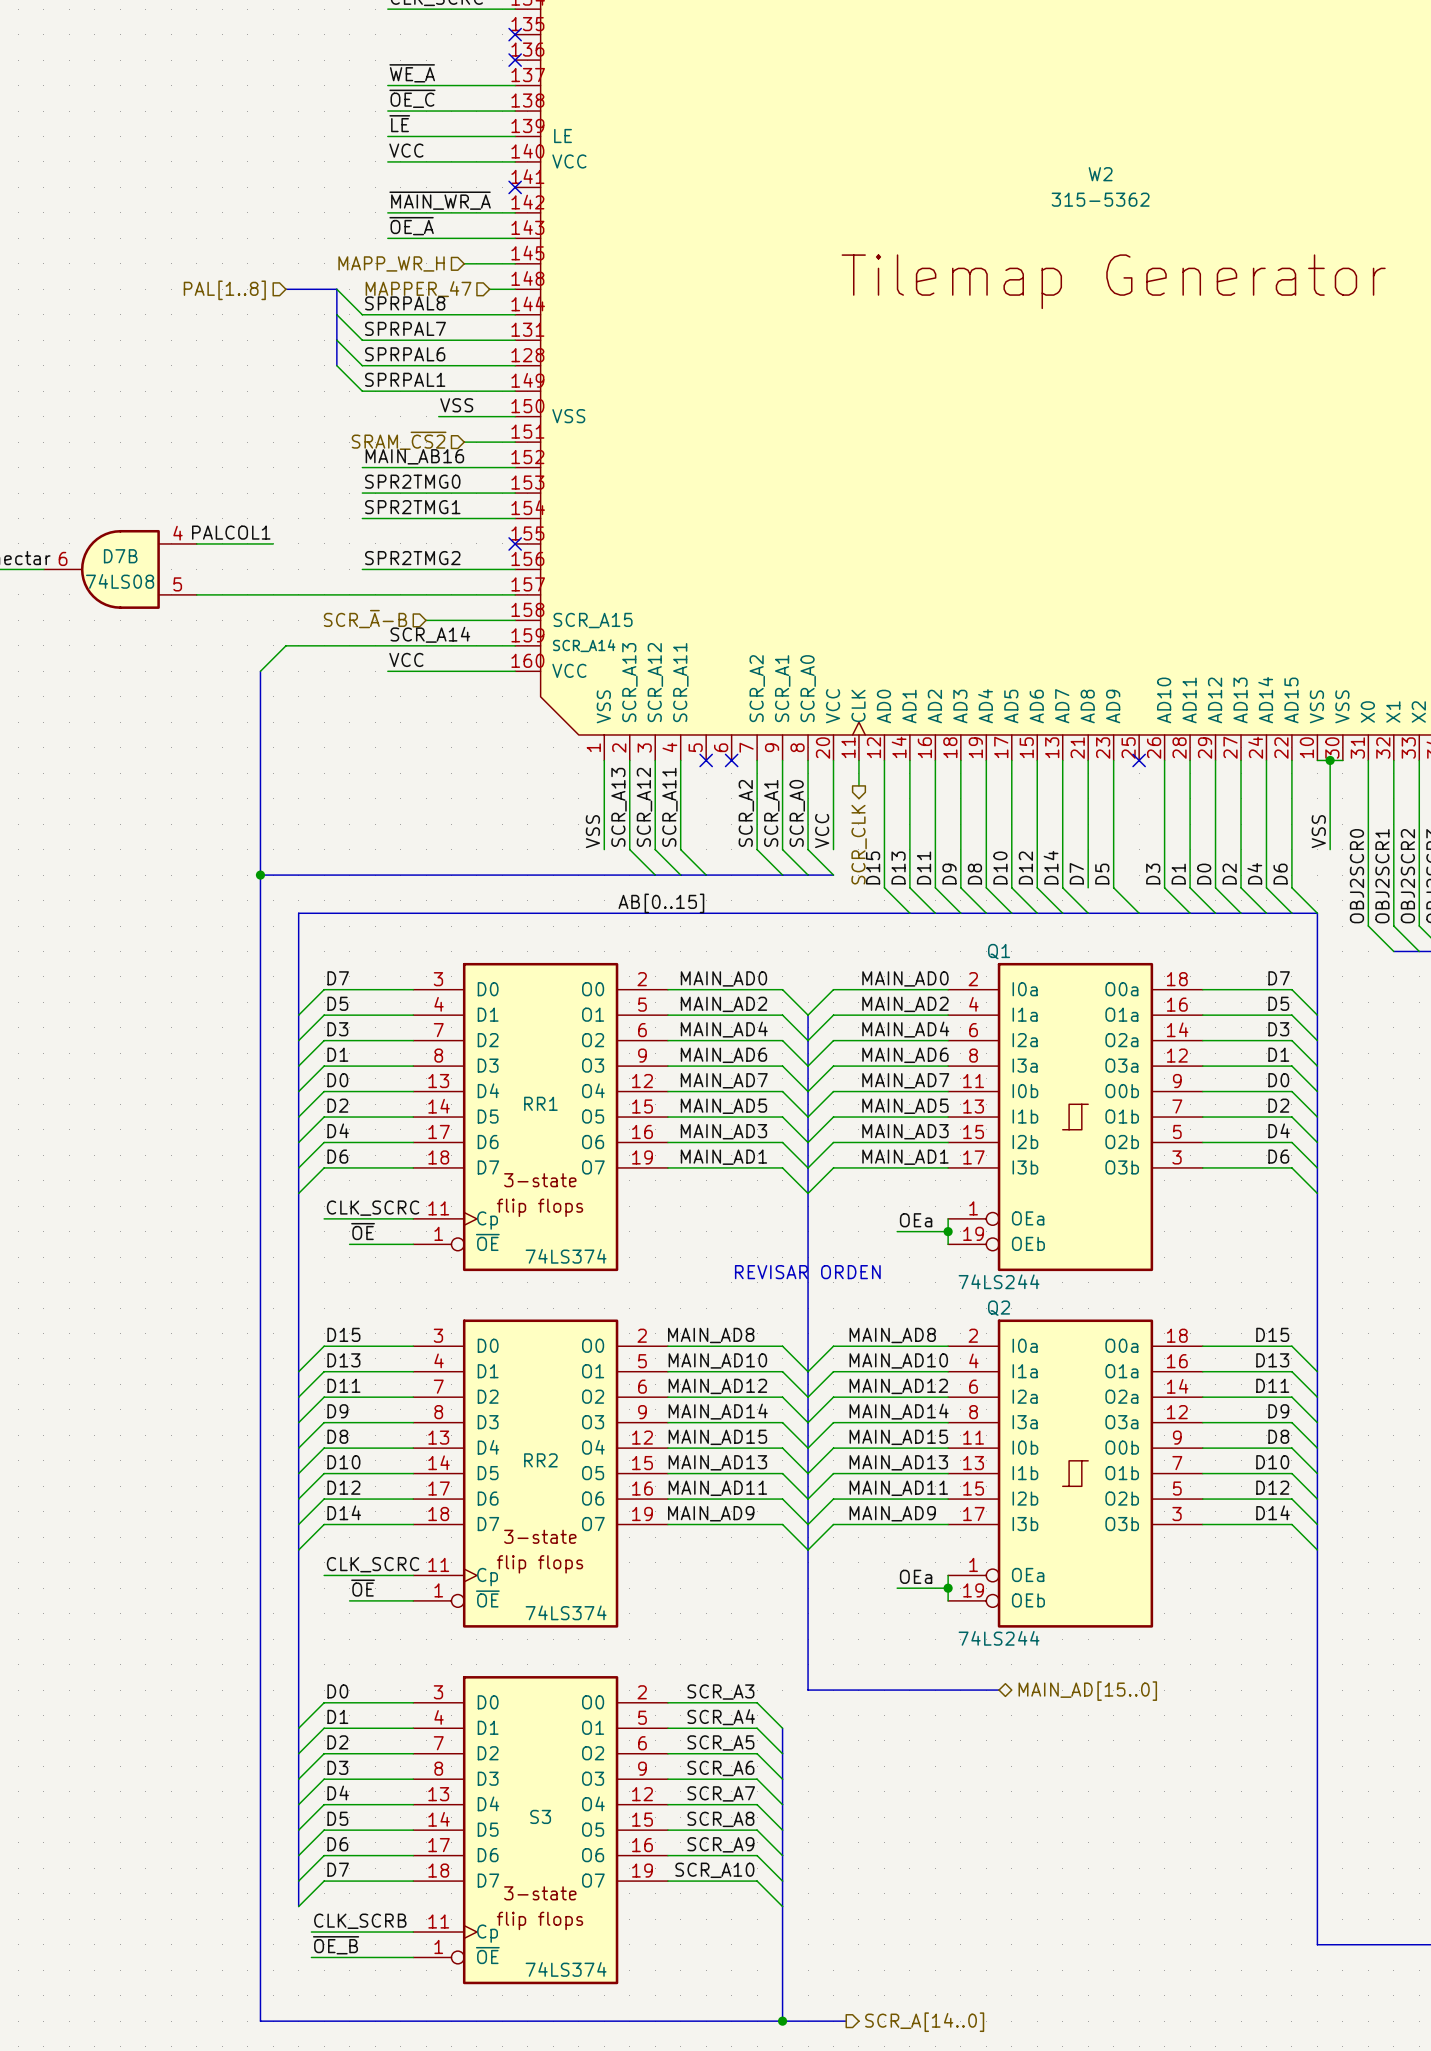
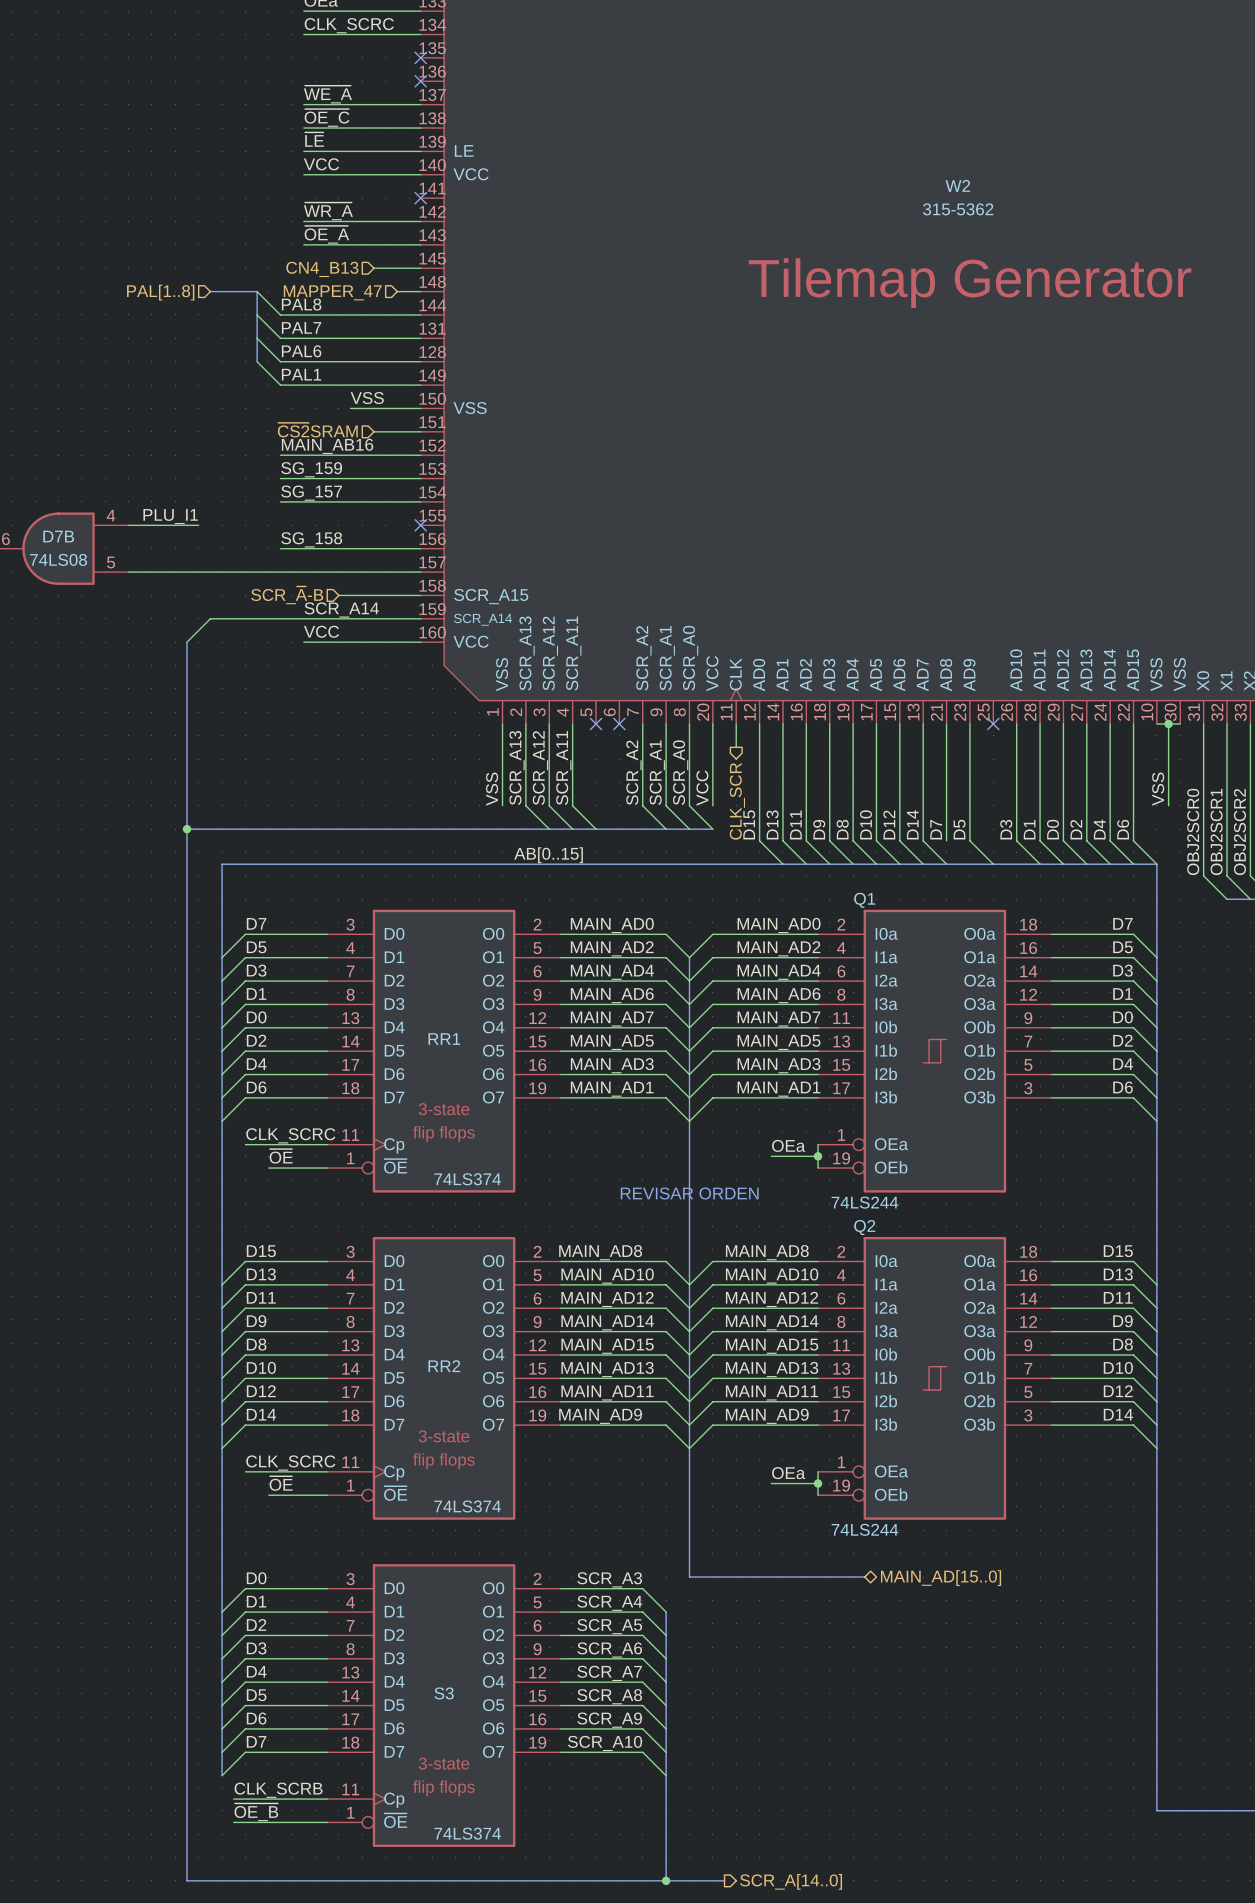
label: ~{MAIN_WR_A} (440, 200) -> ~{WR_A} (328, 211)
hierarchical label: MAPP_WR_H (391, 263) -> CN4_B13 (322, 269)
label: SPRPAL8 (405, 303) -> PAL8 (301, 304)
label: SPRPAL7 (405, 328) -> PAL7 (301, 327)
label: SPRPAL6 (405, 354) -> PAL6 (301, 351)
label: SPRPAL1 (405, 379) -> PAL1 (301, 374)
hierarchical label: SRAM_~{CS2} (399, 440) -> ~{CS2}SRAM (317, 430)
label: SPR2TMG0 (412, 481) -> SG_159 (311, 469)
label: SPR2TMG1 (412, 507) -> SG_157 (311, 493)
label: PALCOL1 (231, 532) -> PLU_I1 (170, 516)
label: SPR2TMG2 (412, 558) -> SG_158 (311, 539)
hierarchical label: SCR_CLK (859, 844) -> CLK_SCR (737, 801)

